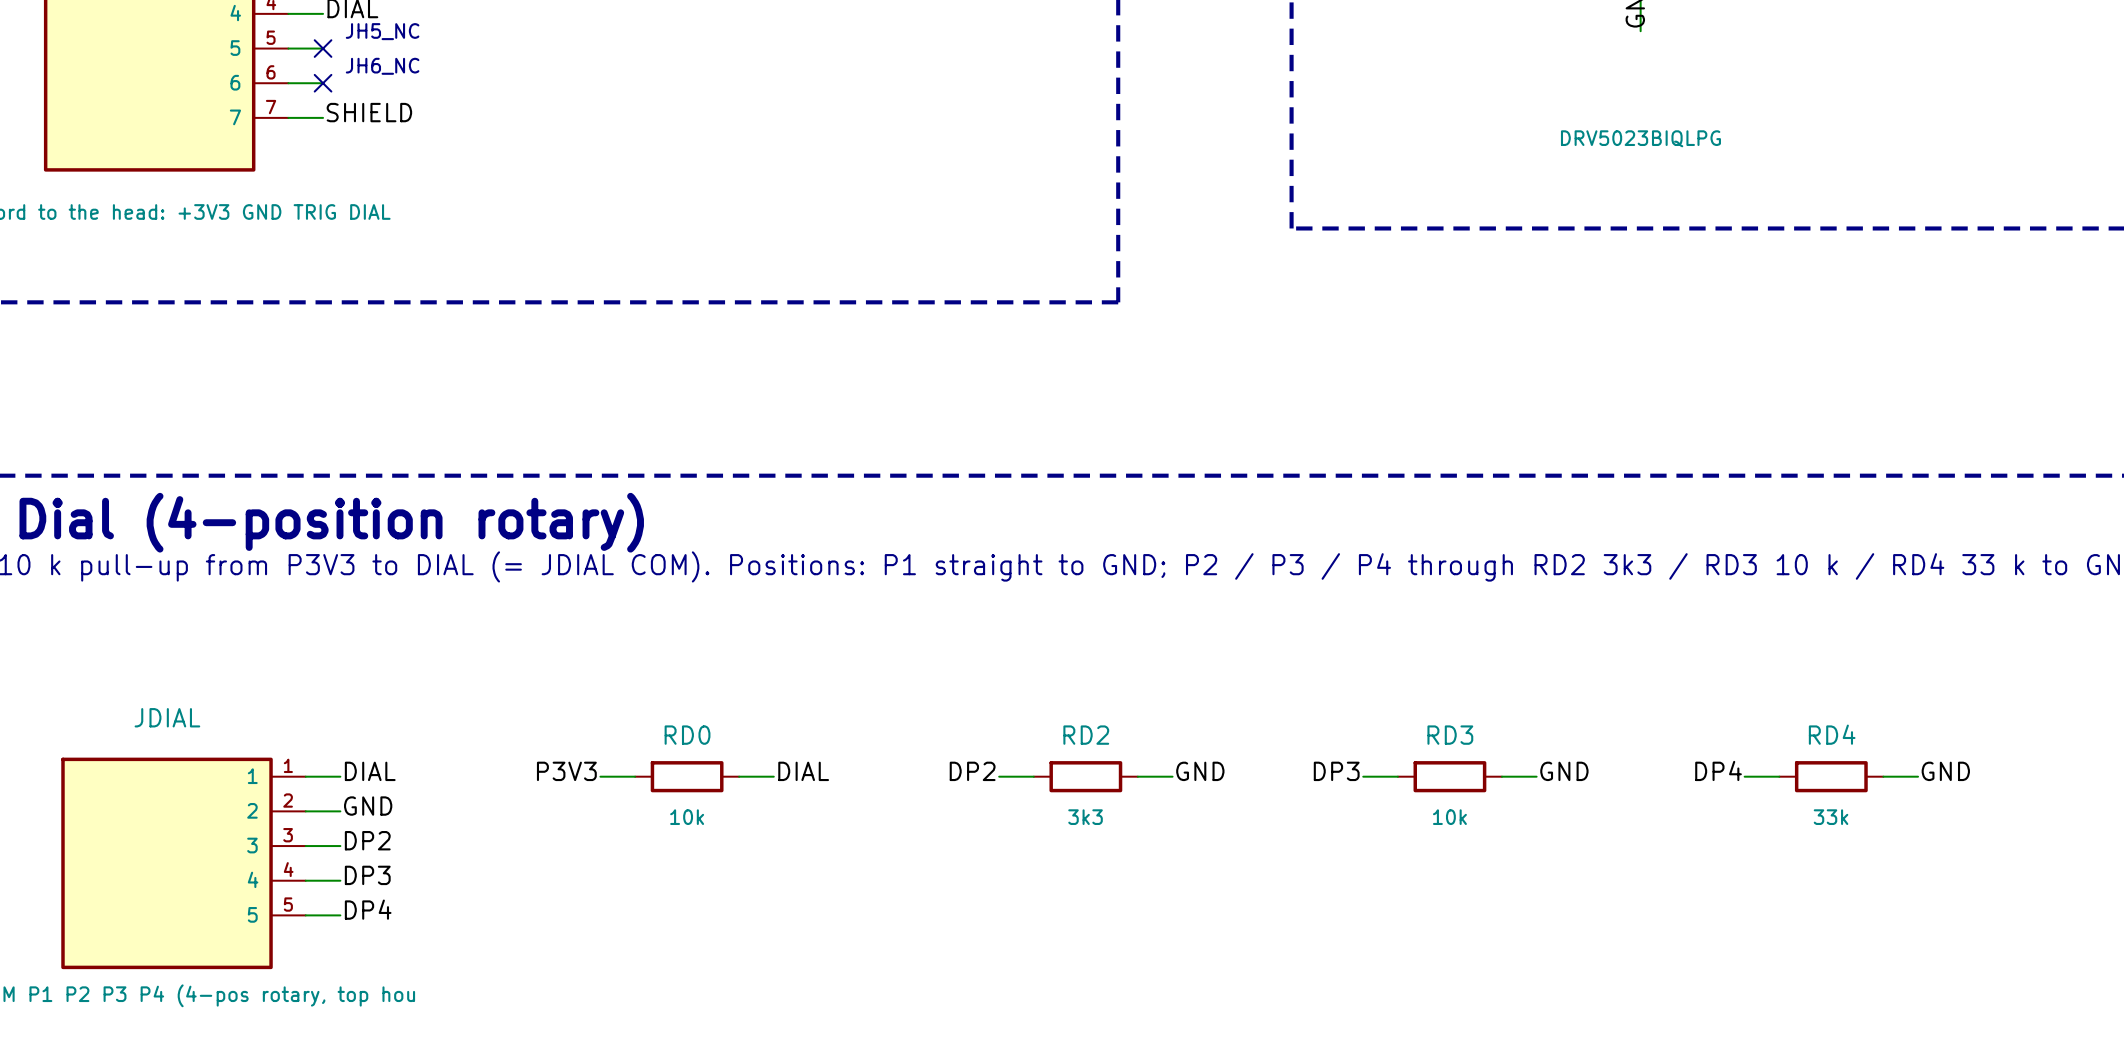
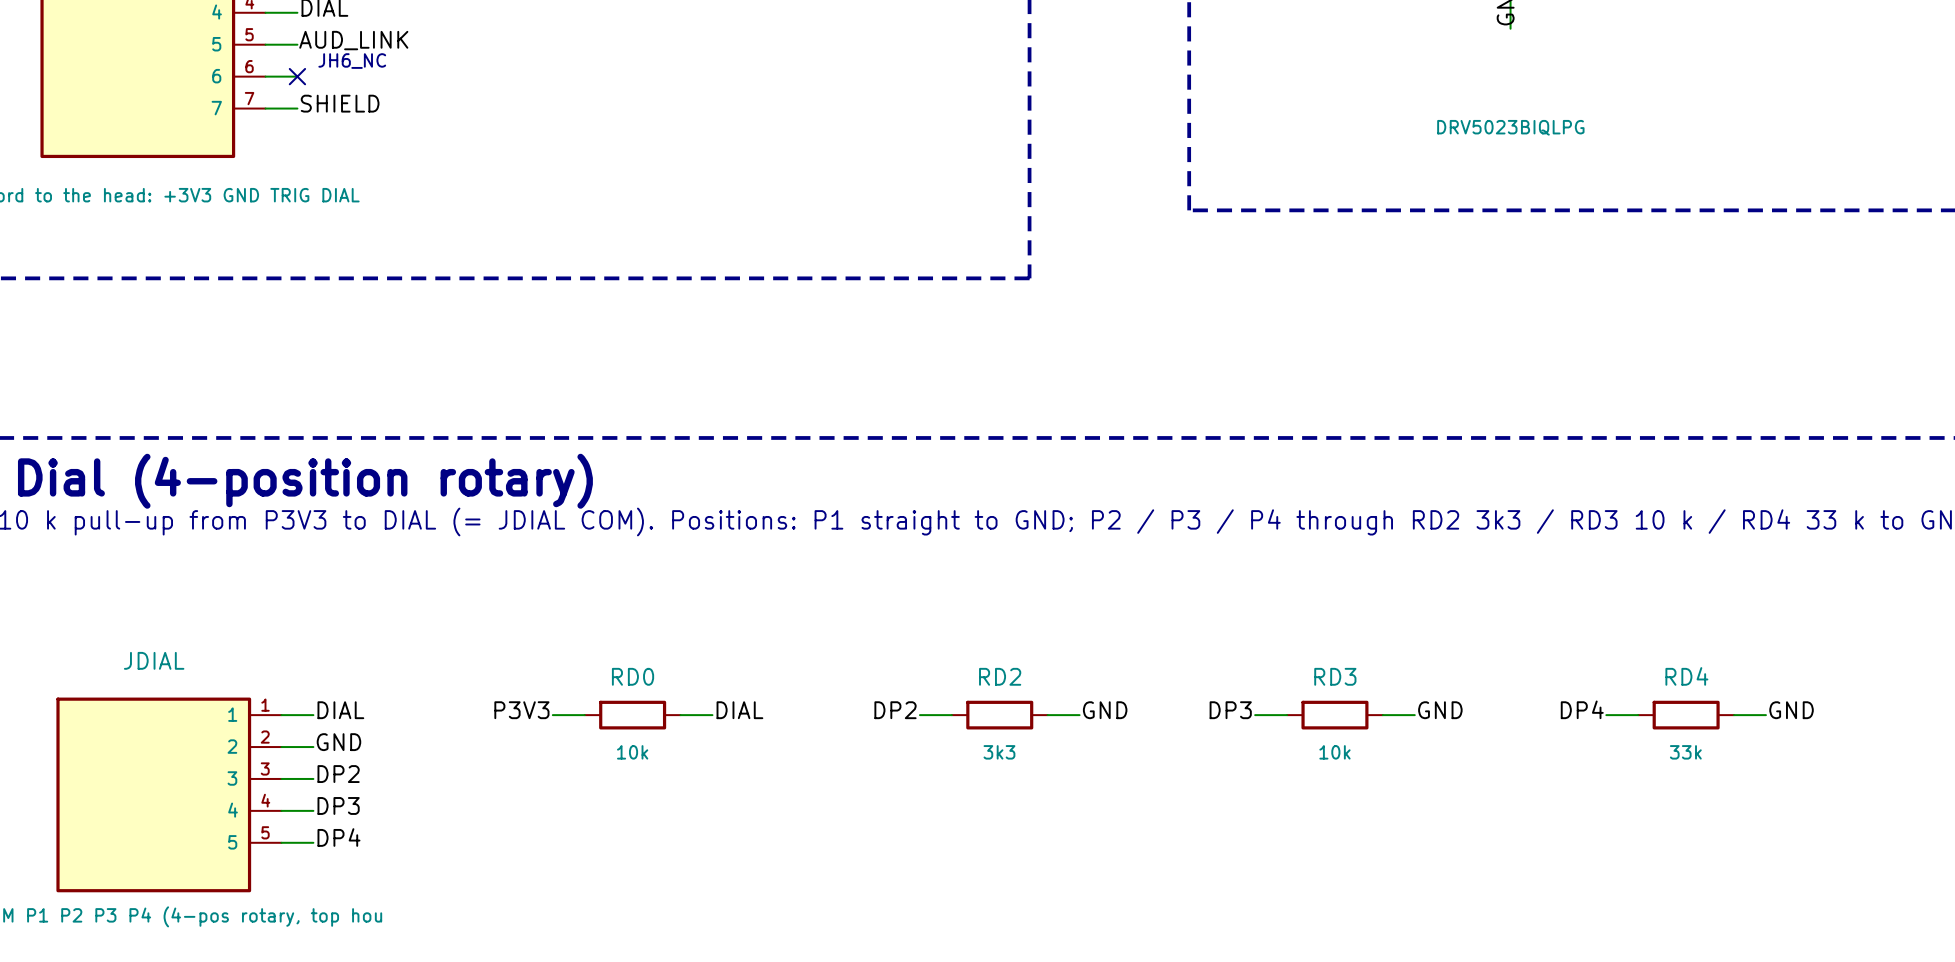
text: JH5_NC (382, 31) -> none
label: none -> AUD_LINK (353, 40)
no-connect mark: (323, 48) -> none

